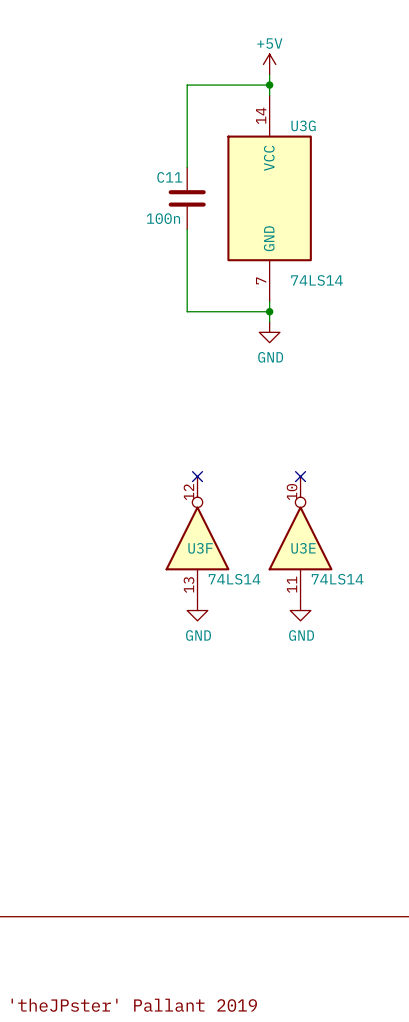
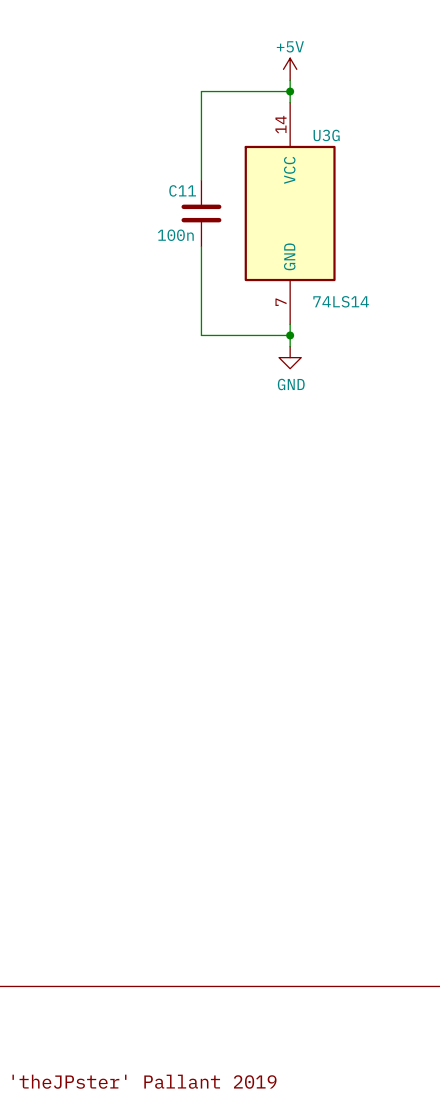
no-connect mark: (197, 476) -> none
no-connect mark: (300, 476) -> none
U3F: 74LS14 (197, 538) -> none
U3E: 74LS14 (300, 538) -> none
power symbol: GND (197, 610) -> none
power symbol: GND (300, 610) -> none

